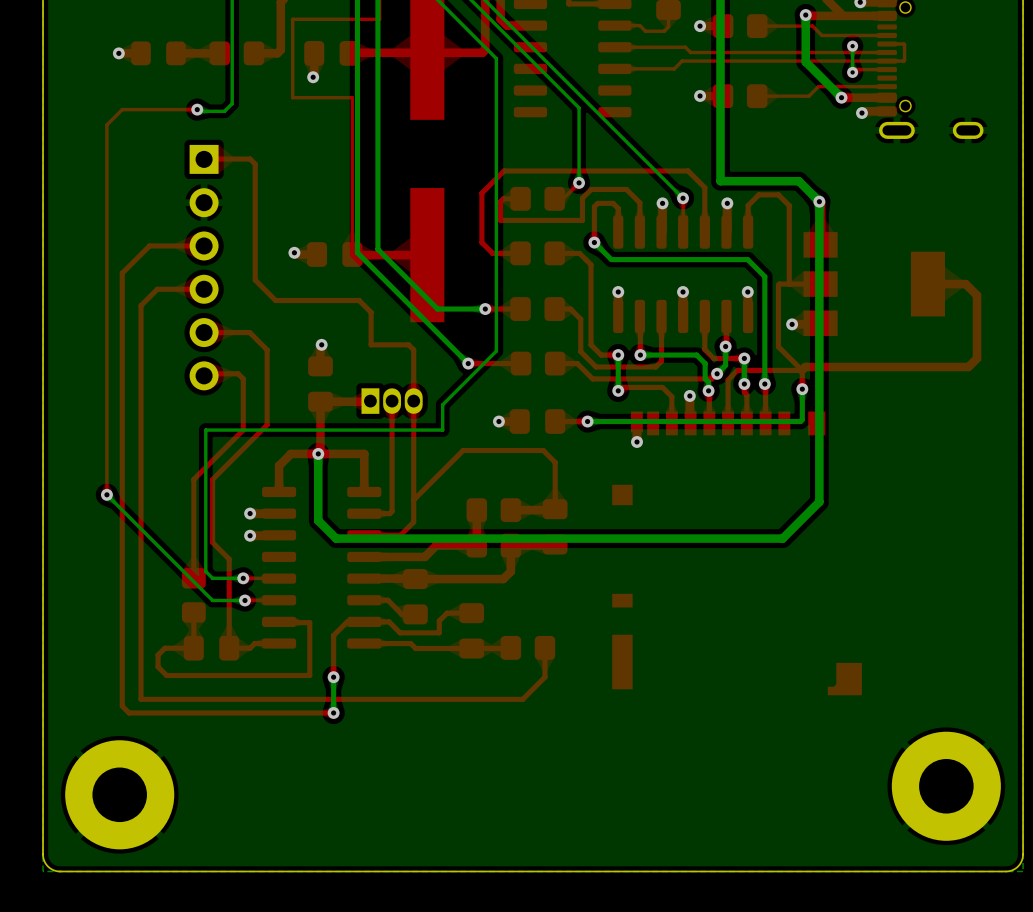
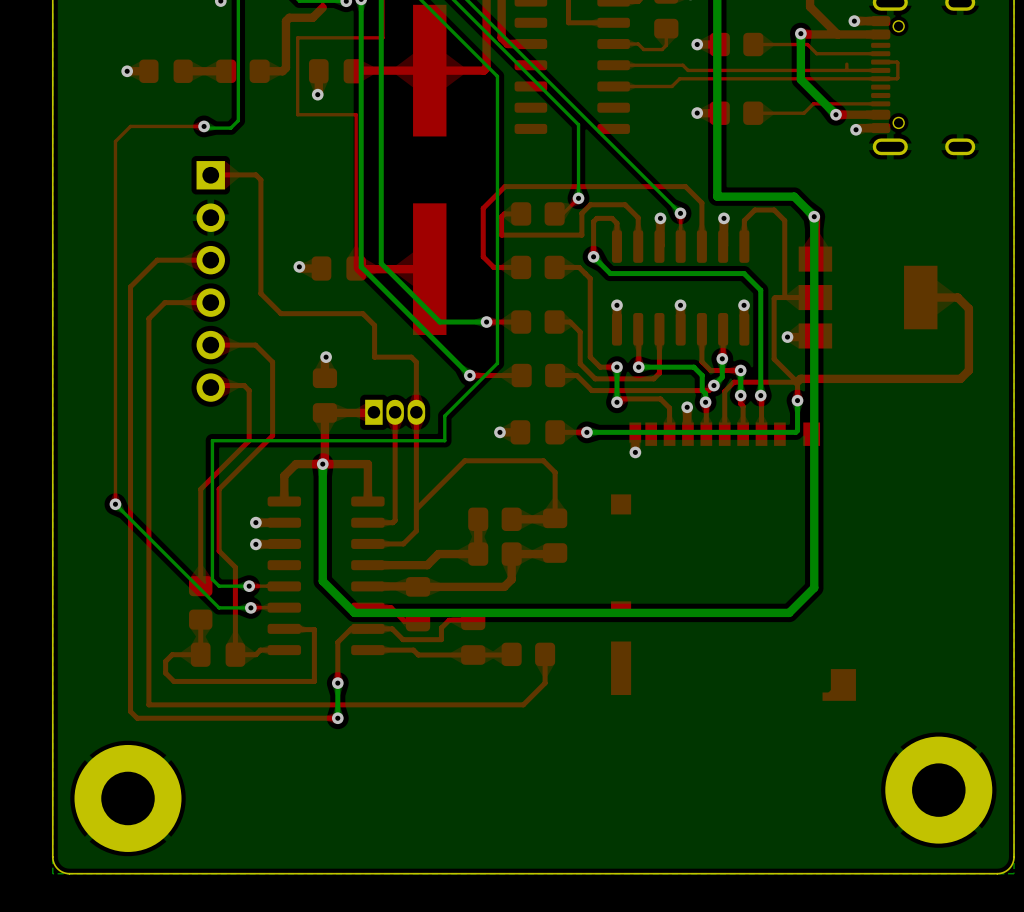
bottom track: (852, 46) (852, 72) -> none
via: (852, 46) -> none
top track: (887, 69) (855, 69) (852, 72) -> none
via: (852, 72) -> none
bottom track: (819, 501) (782, 538) (336, 538) (318, 520) -> (814, 511) (814, 587) (789, 612) (354, 612) (322, 581) (322, 529)

